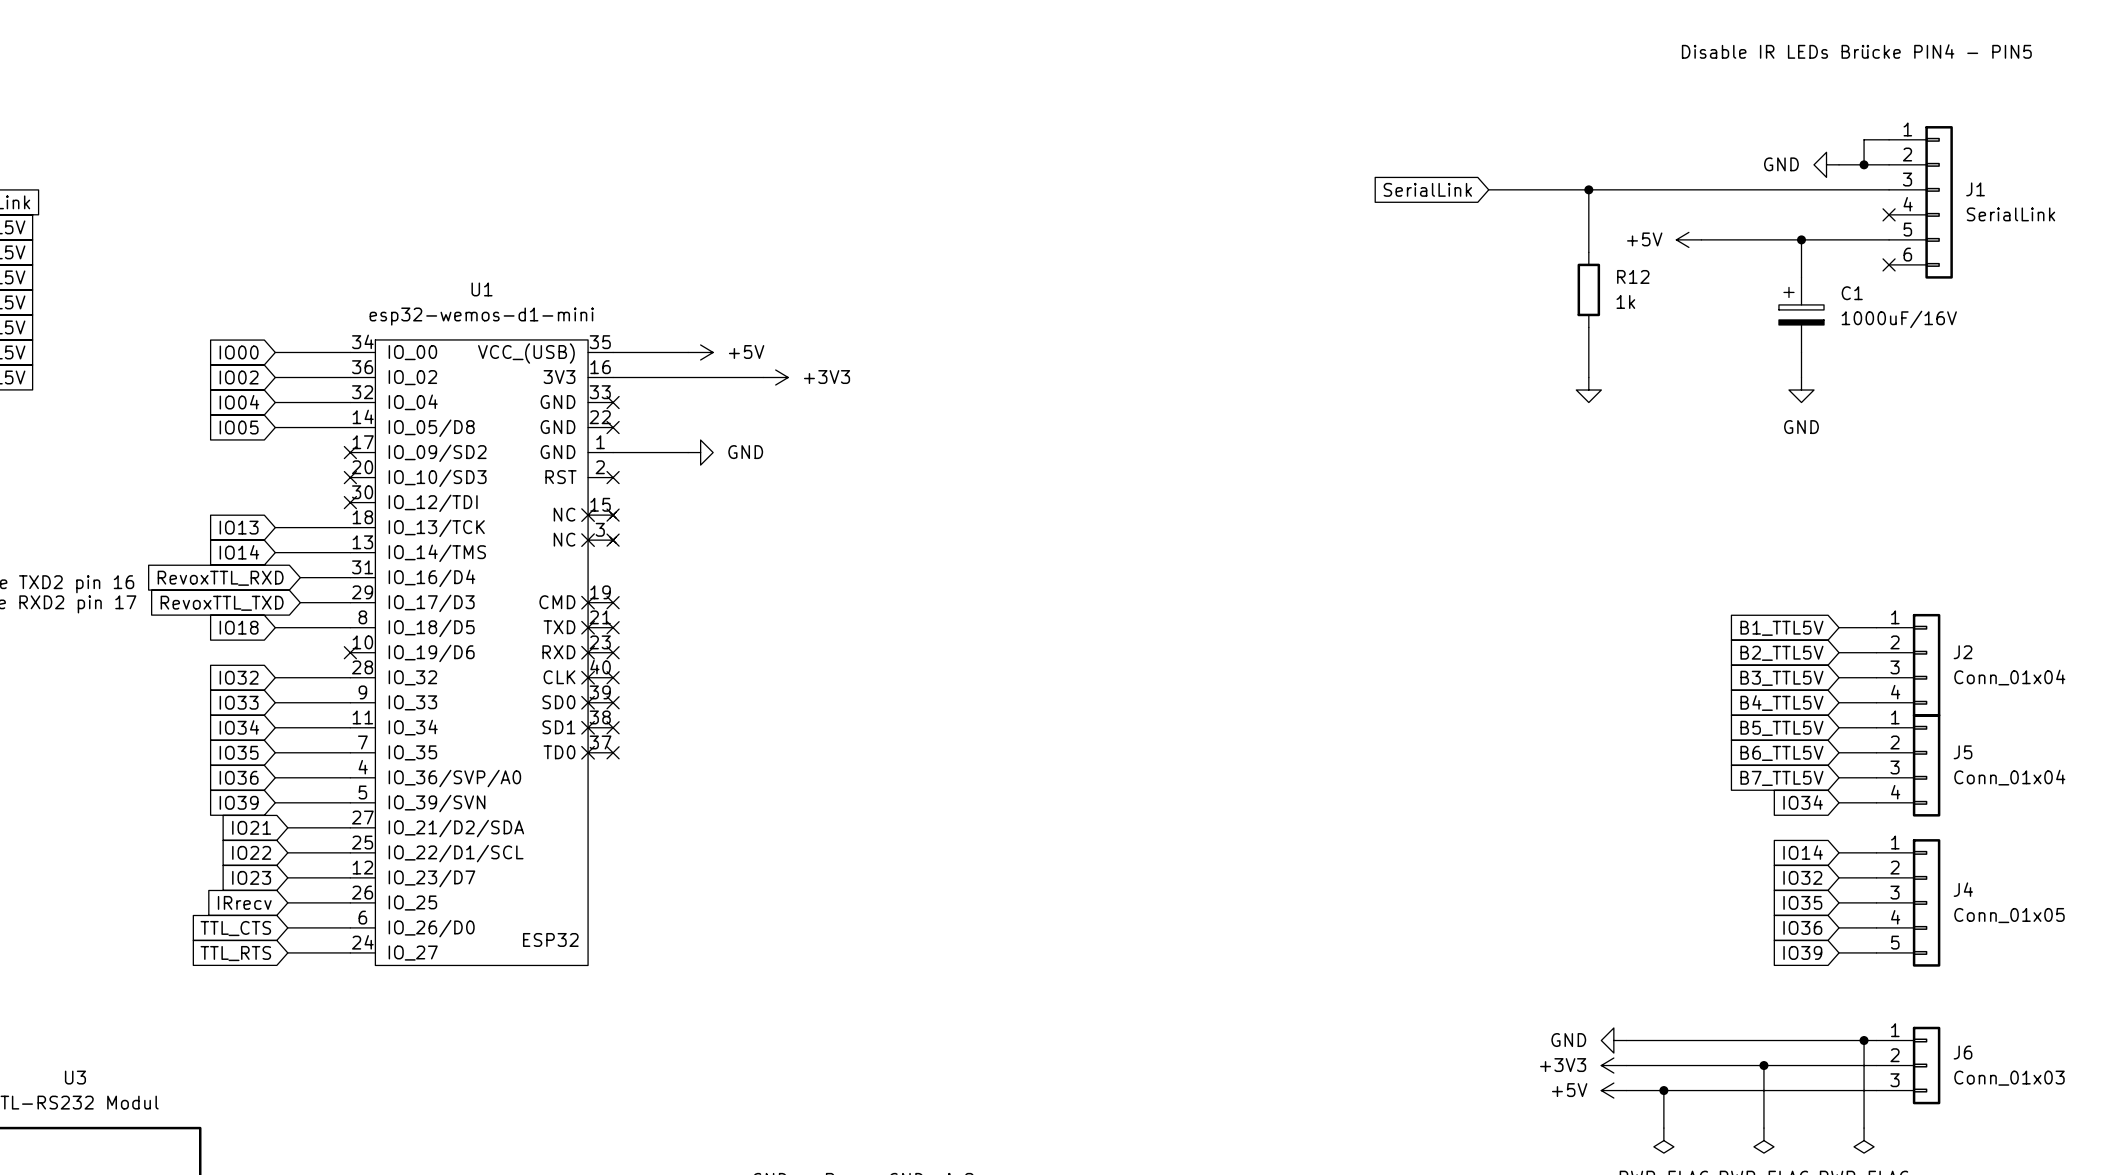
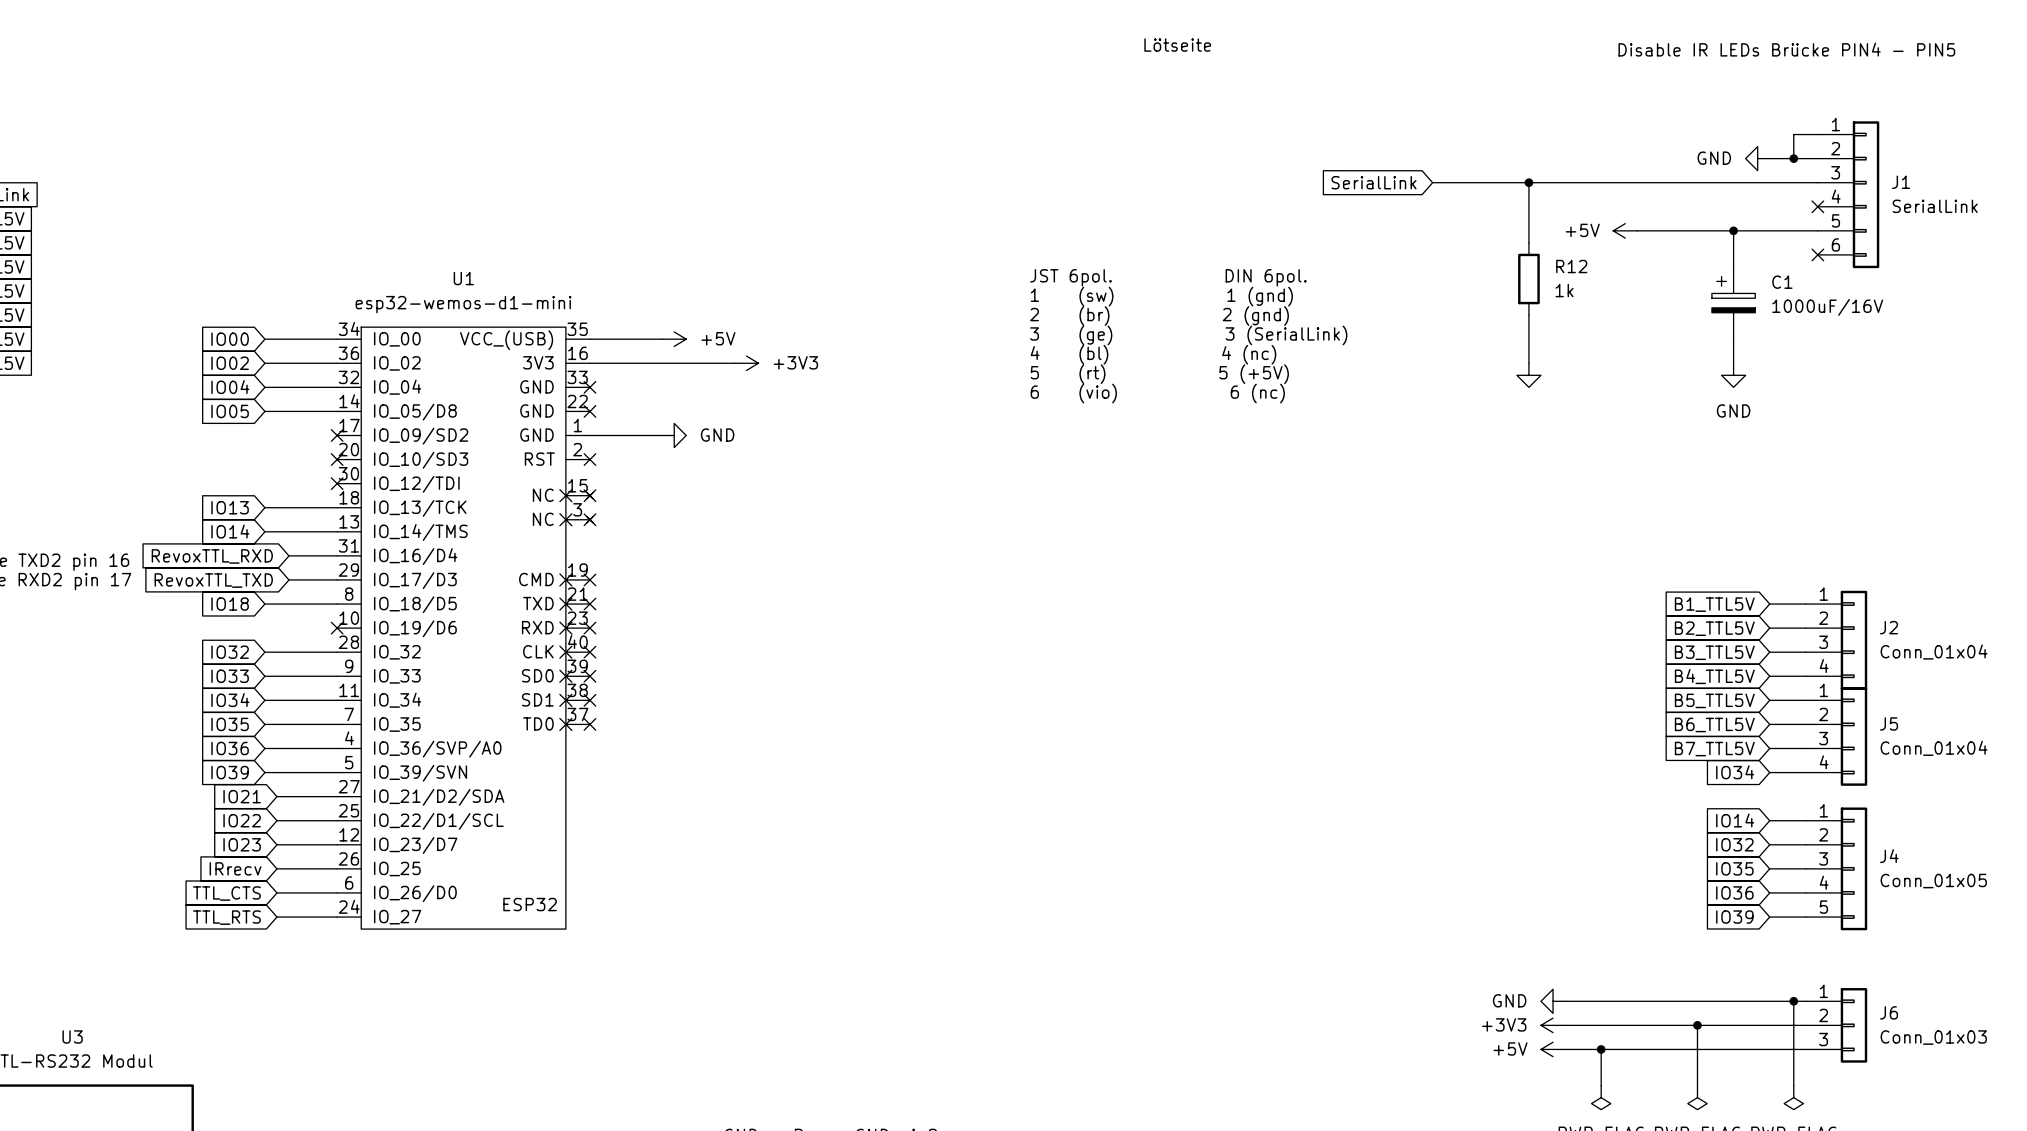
text: none -> Lötseite (1177, 45)
text: none -> JST 6pol. DIN 6pol. (1168, 277)
text: none -> 1 (sw) 1 (gnd) (1161, 296)
text: none -> 2 (br) 2 (gnd) (1159, 316)
text: none -> 3 (ge) 3 (SerialLink) (1188, 335)
text: none -> 4 (bl) 4 (nc) (1153, 354)
text: none -> 5 (rt) 5 (+5V) (1159, 374)
text: none -> 6 (vio) 6 (nc) (1157, 393)

